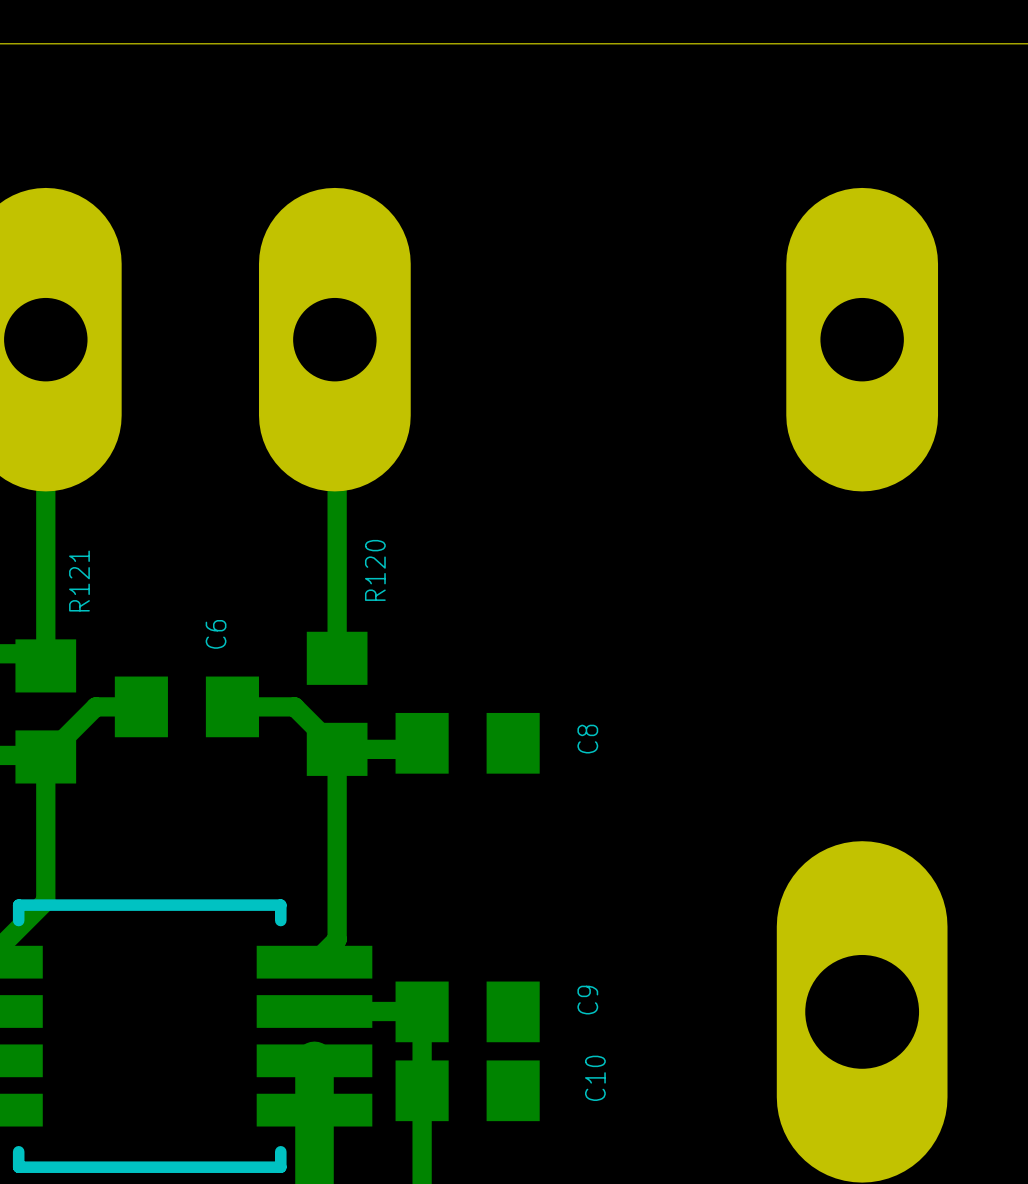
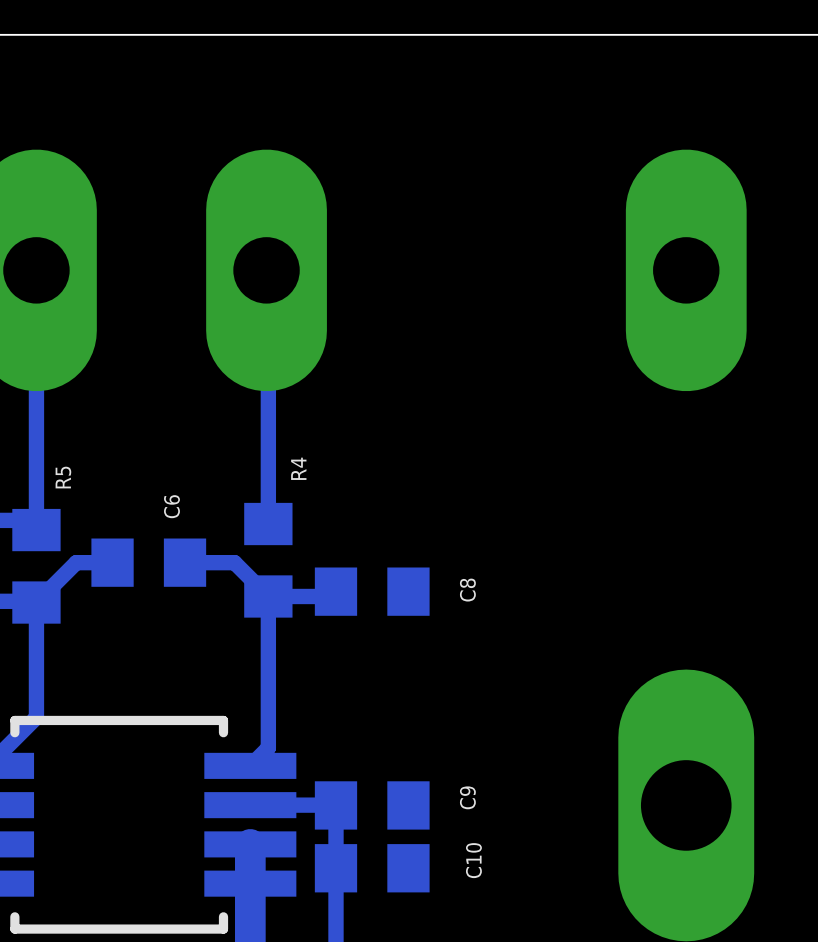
R120 name: R120 (375, 570) -> R4 (298, 468)
R121 name: R121 (79, 581) -> R5 (63, 477)

